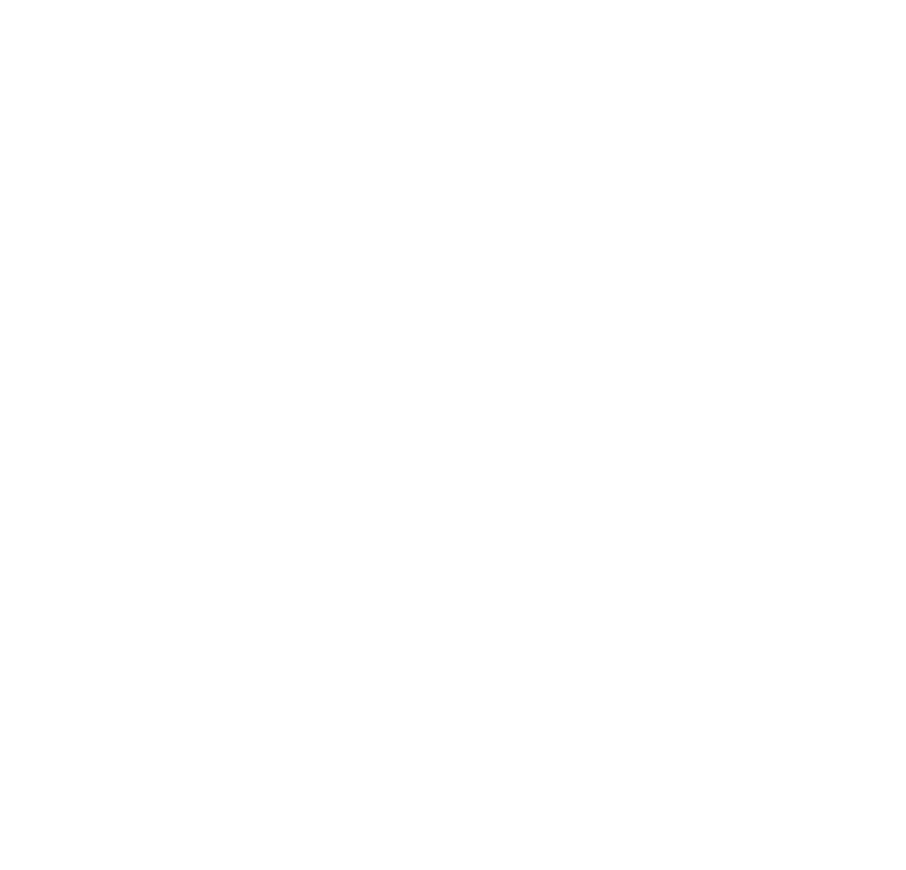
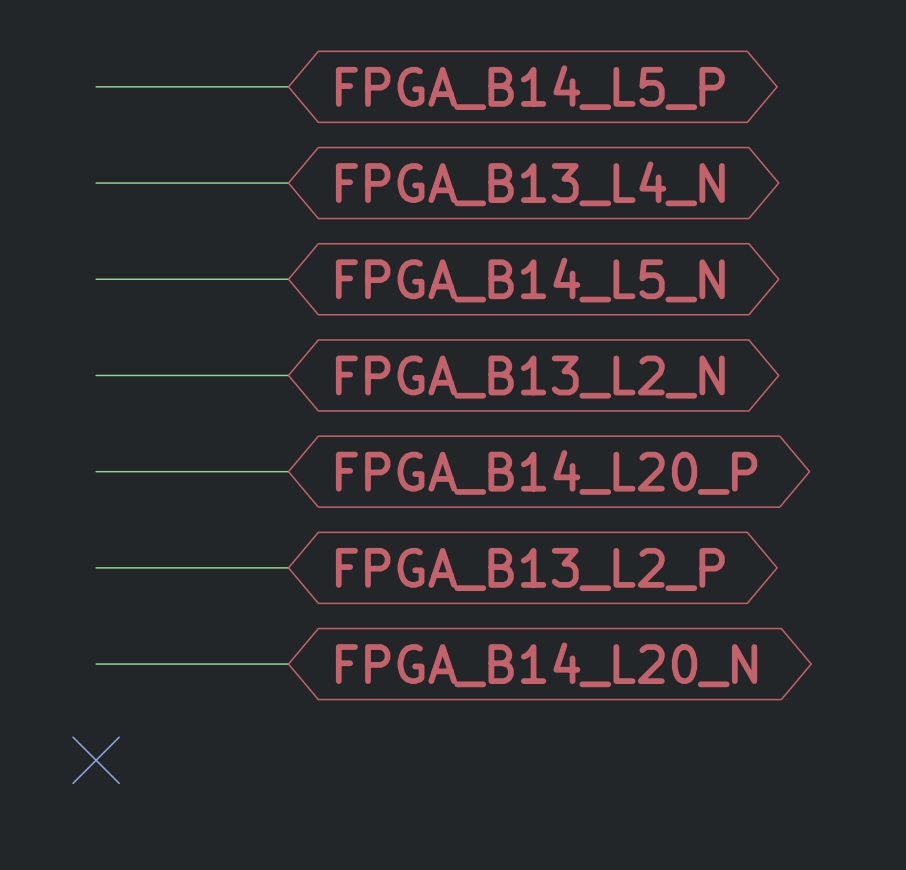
wire: none -> (96, 86) (288, 86)
global label: none -> FPGA_B14_L5_P (530, 87)
wire: none -> (96, 183) (288, 183)
global label: none -> FPGA_B13_L4_N (530, 183)
wire: none -> (96, 279) (288, 279)
global label: none -> FPGA_B14_L5_N (530, 280)
wire: none -> (96, 375) (288, 375)
global label: none -> FPGA_B13_L2_N (530, 377)
wire: none -> (96, 471) (288, 471)
global label: none -> FPGA_B14_L20_P (546, 472)
wire: none -> (96, 567) (288, 567)
global label: none -> FPGA_B13_L2_P (530, 569)
wire: none -> (96, 664) (288, 664)
global label: none -> FPGA_B14_L20_N (546, 664)
no-connect mark: none -> (96, 760)

